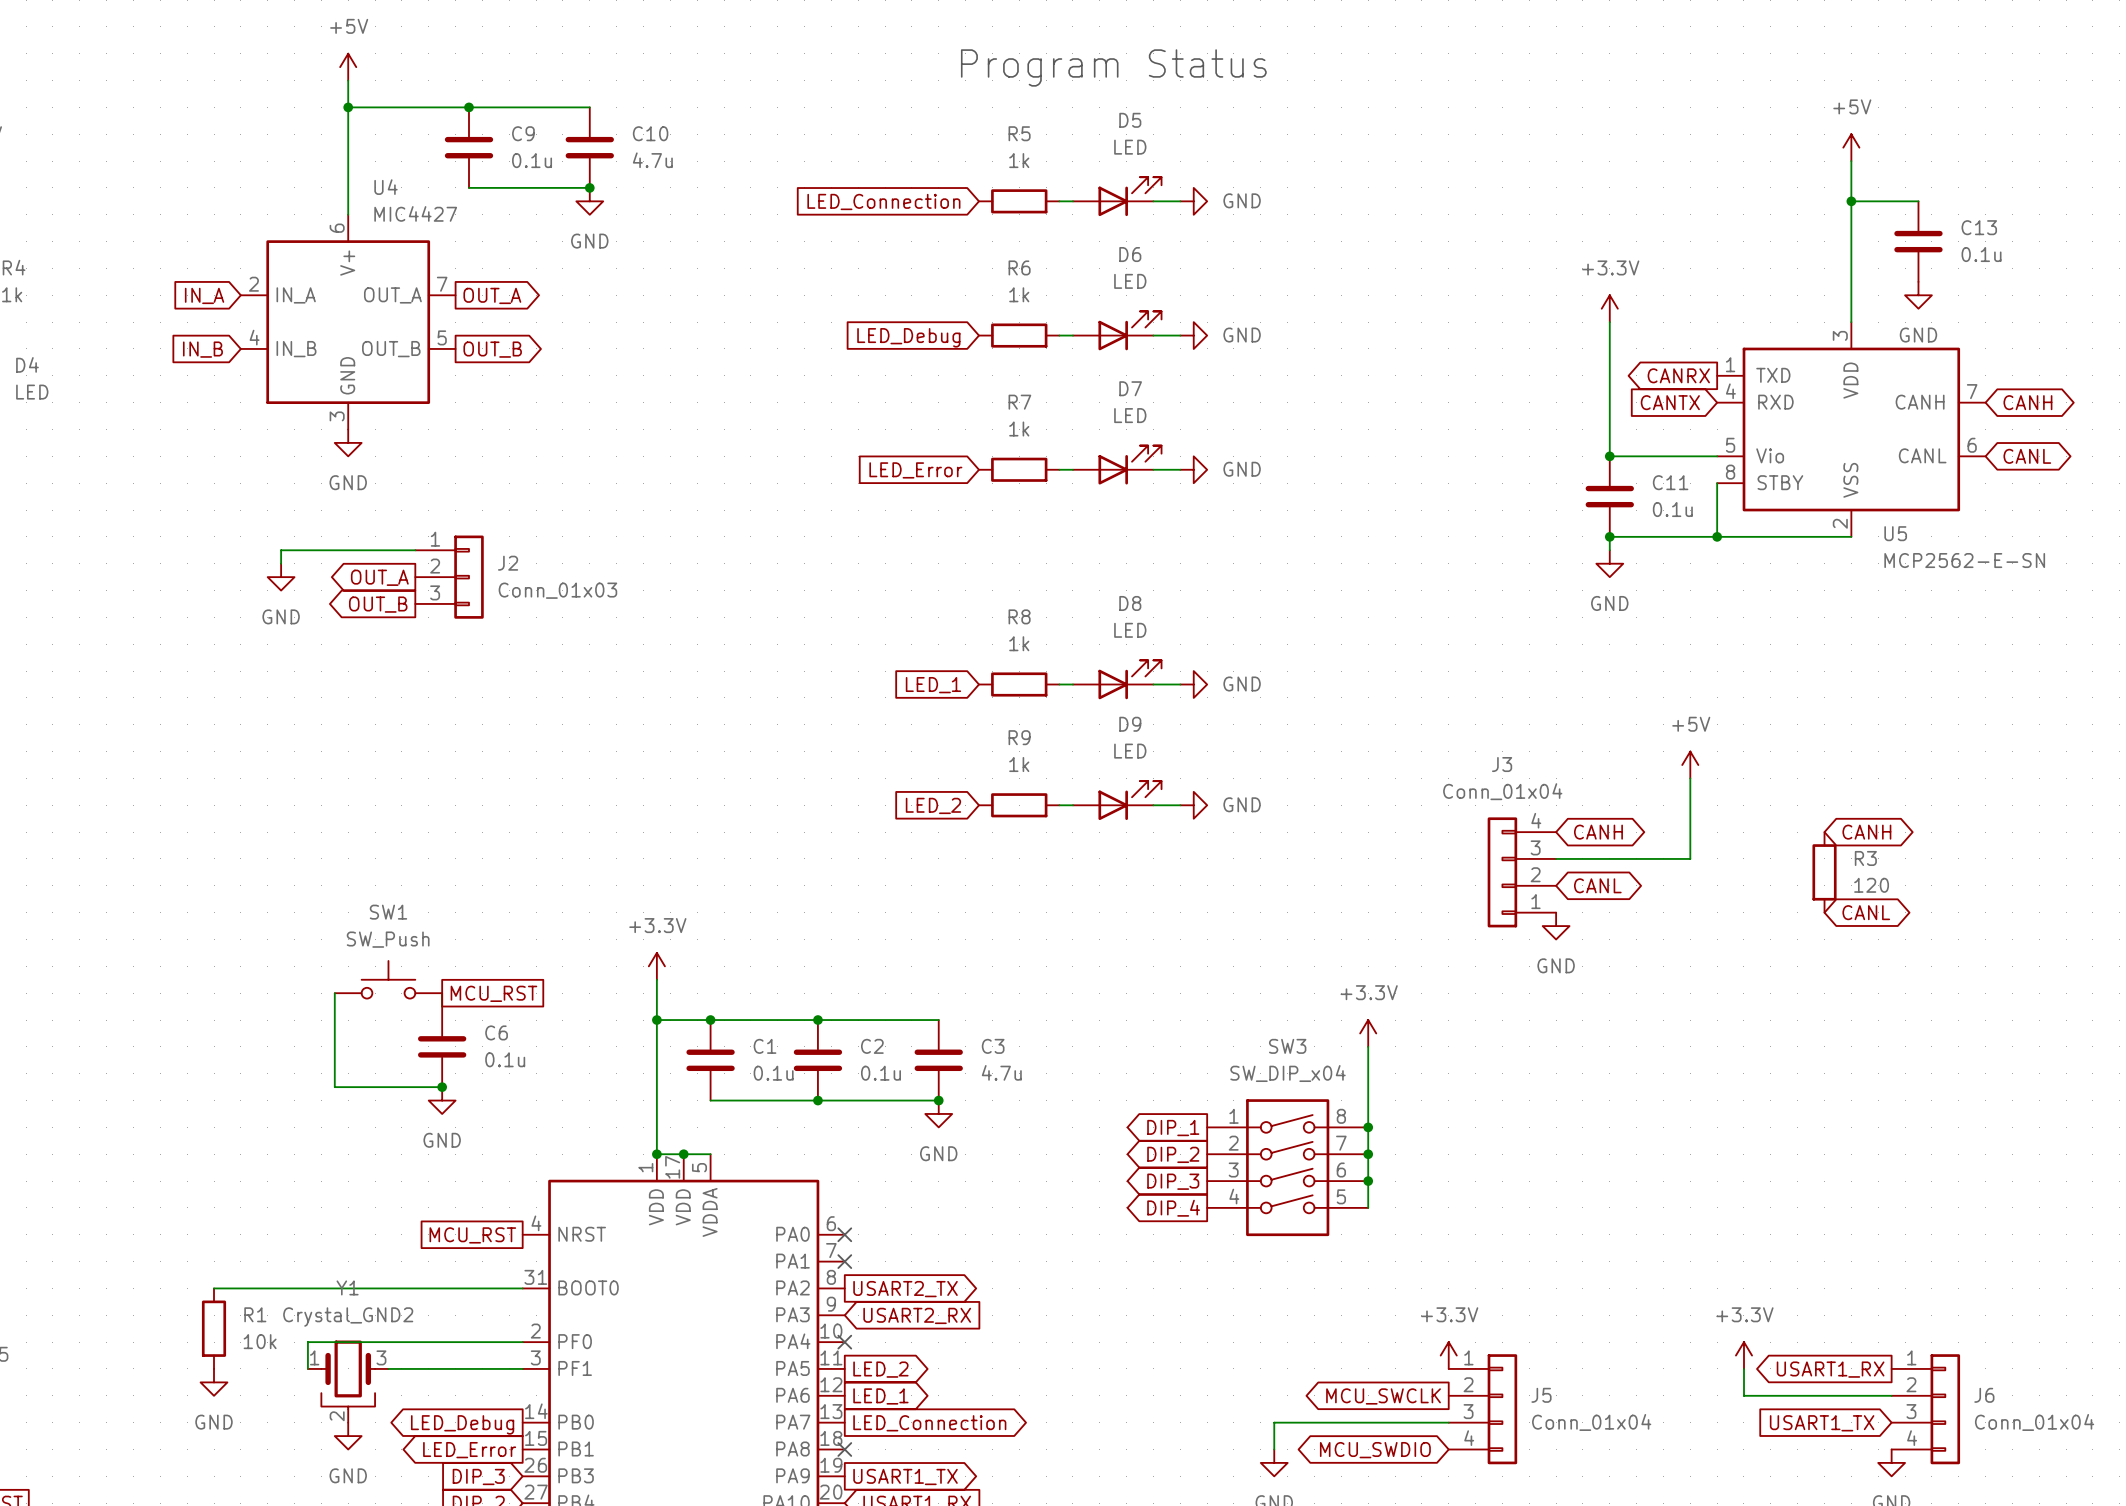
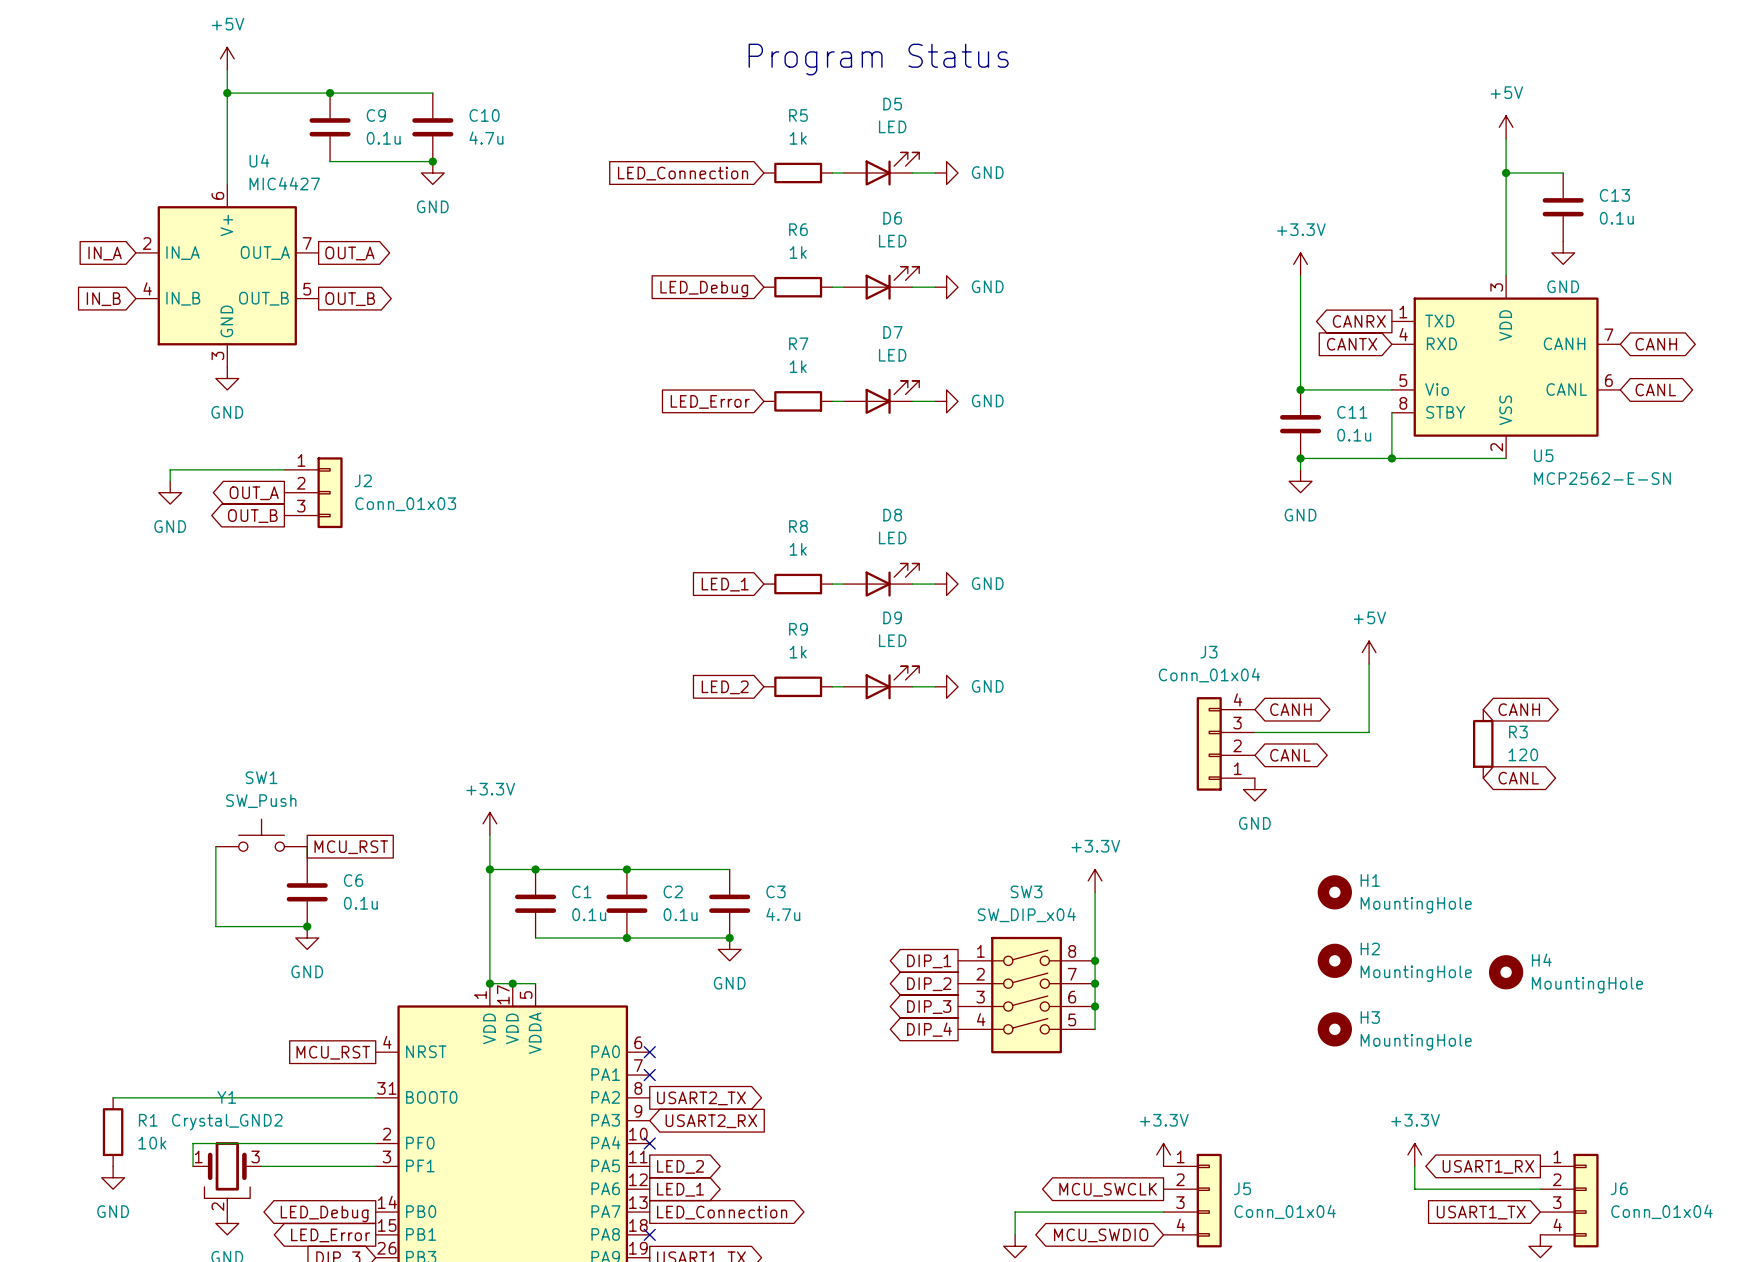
H1: none -> MountingHole (1334, 892)
H2: none -> MountingHole (1334, 960)
H4: none -> MountingHole (1506, 972)
H3: none -> MountingHole (1334, 1029)

